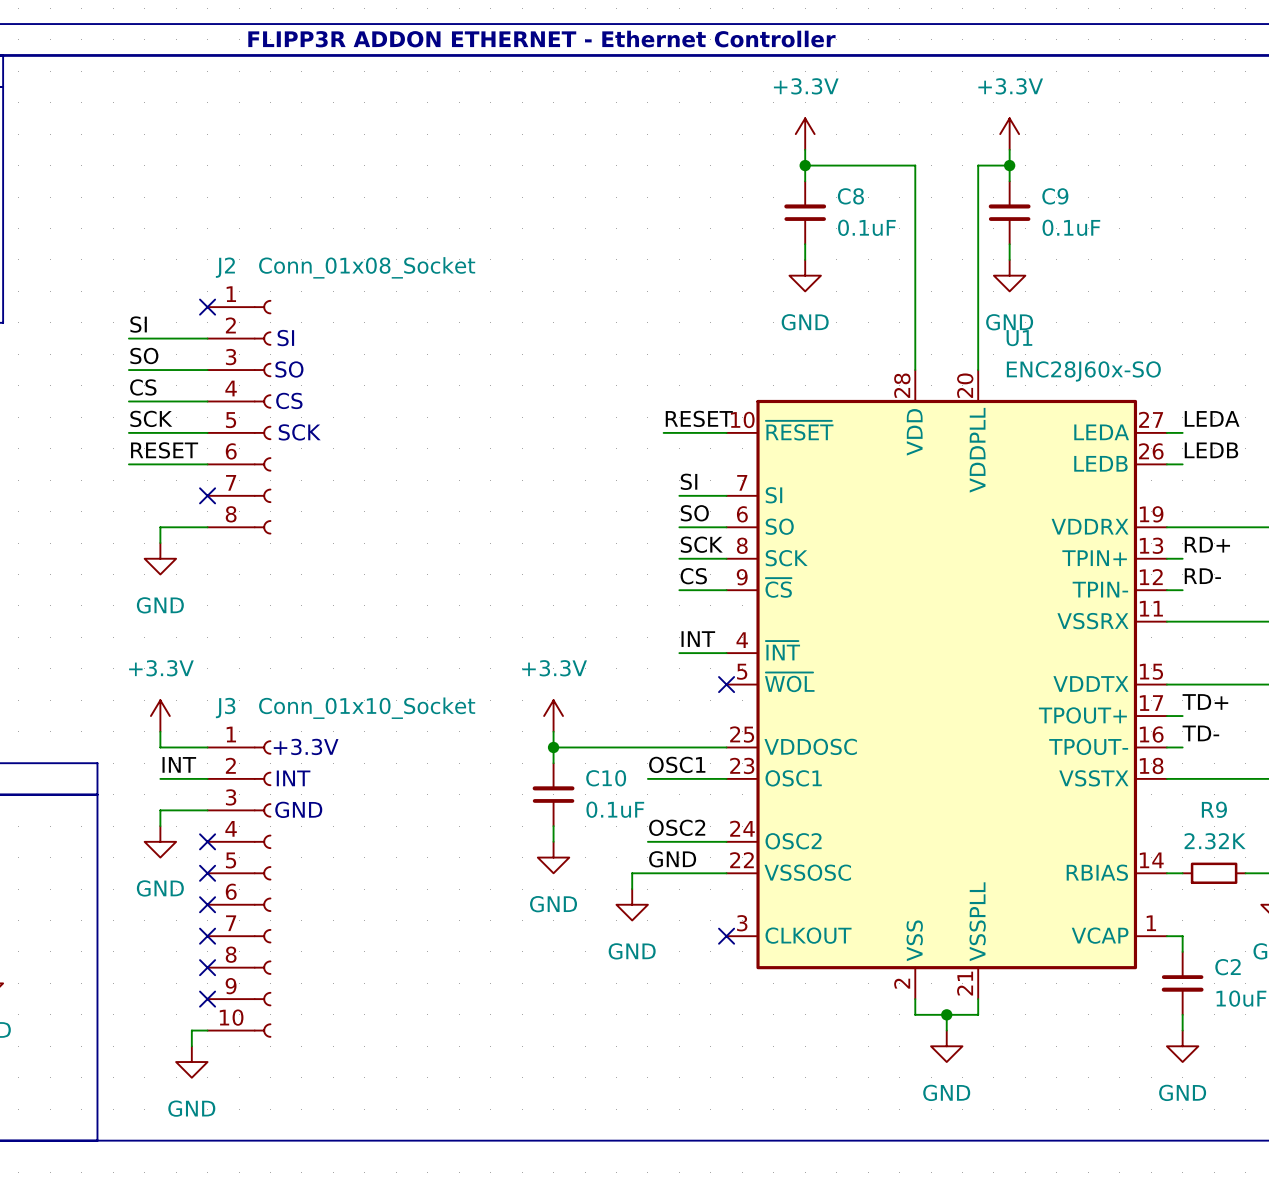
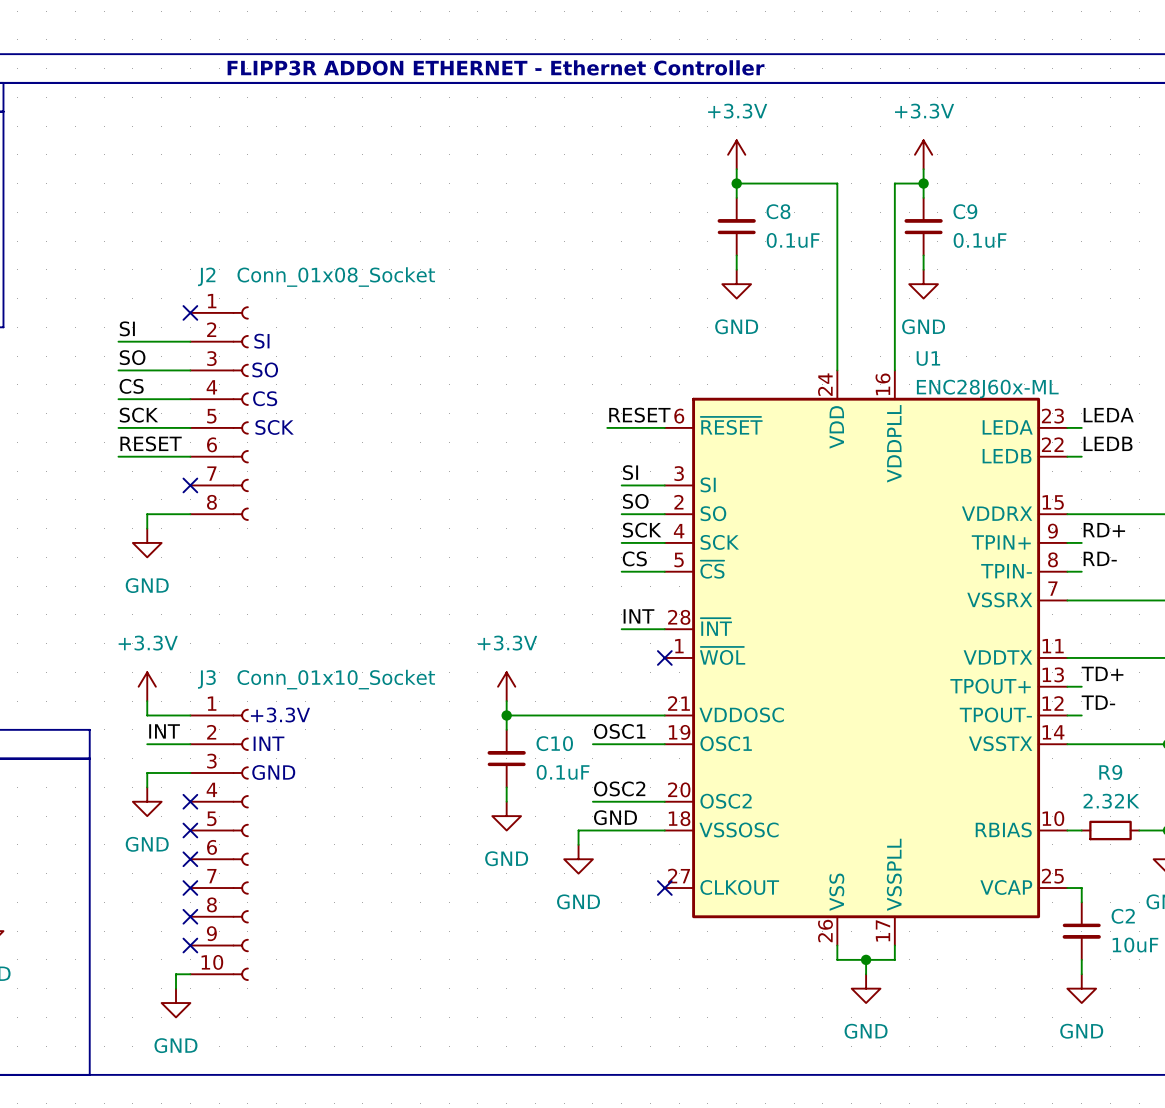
U1 symbol: [726, 370, 1167, 1000] -> [664, 370, 1068, 946]
U1 value: ENC28J60x-SO (1083, 371) -> ENC28J60x-ML (987, 389)

